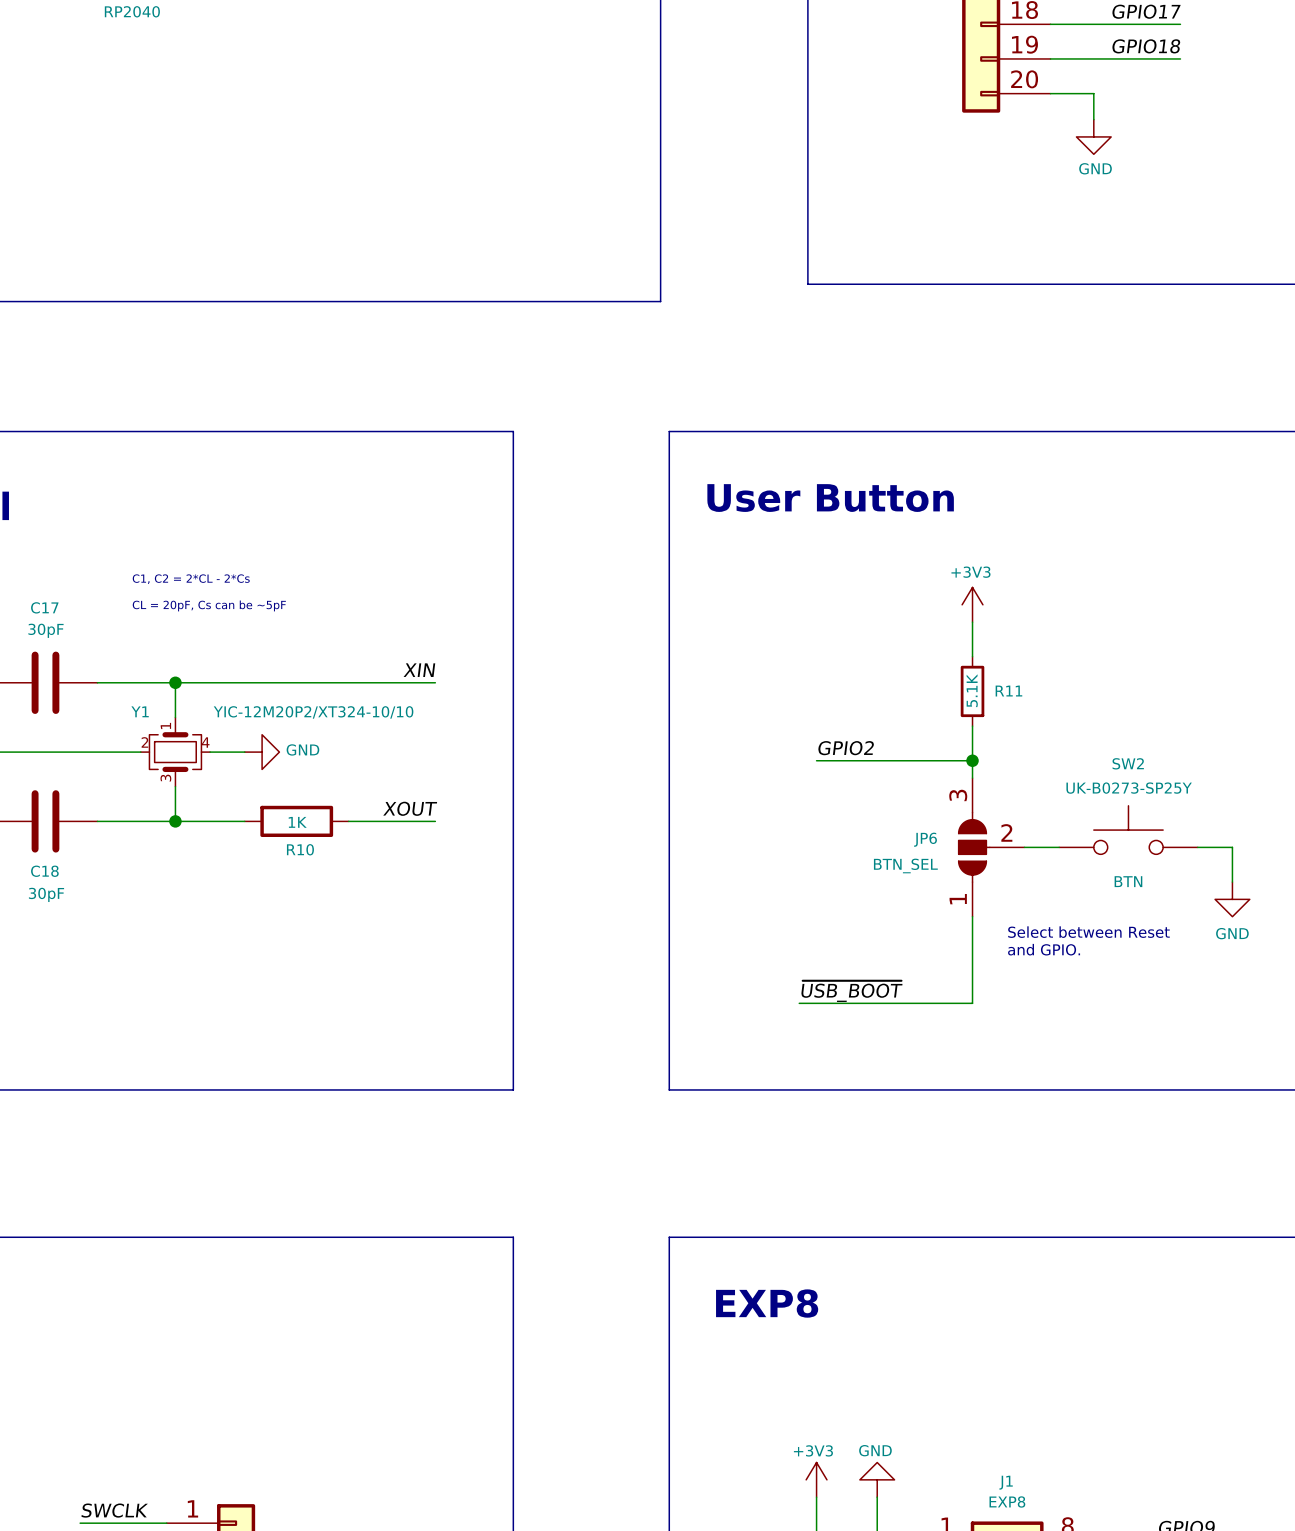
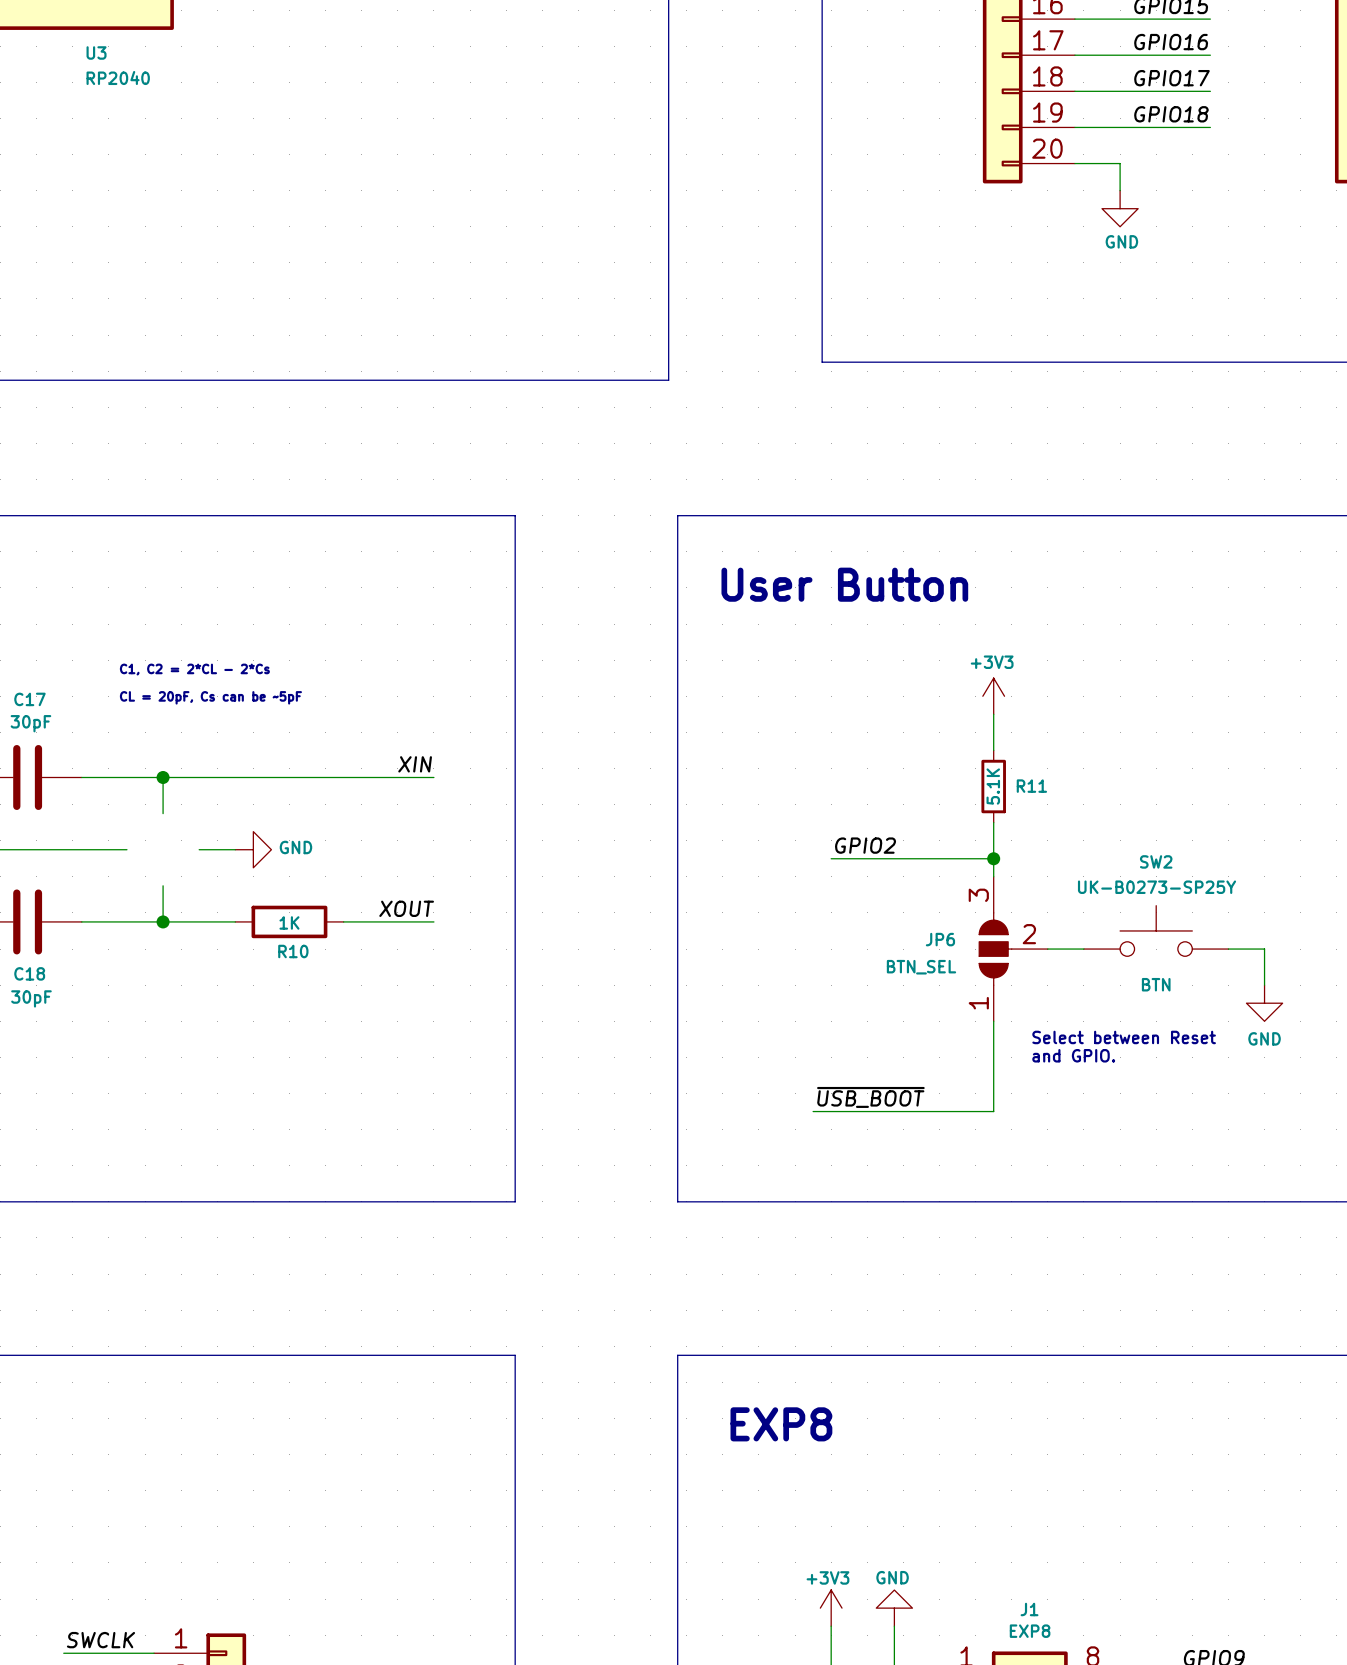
Y1: YIC-12M20P2/XT324-10/10 (175, 752) -> none

